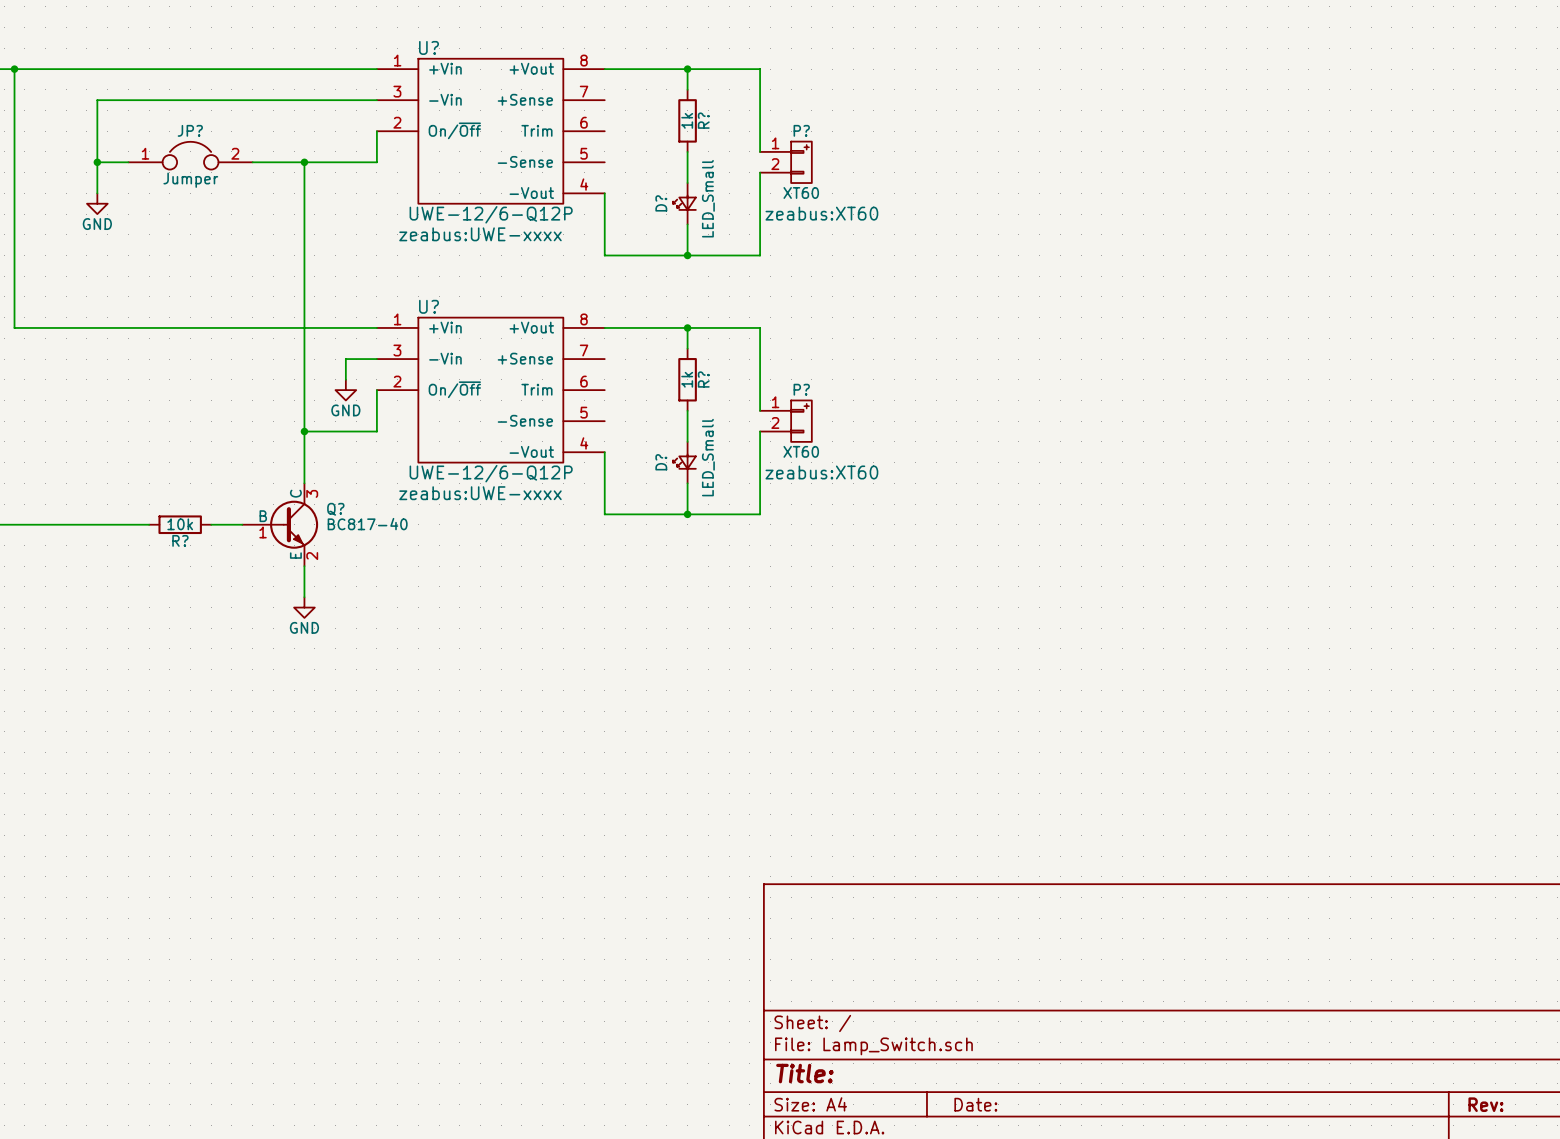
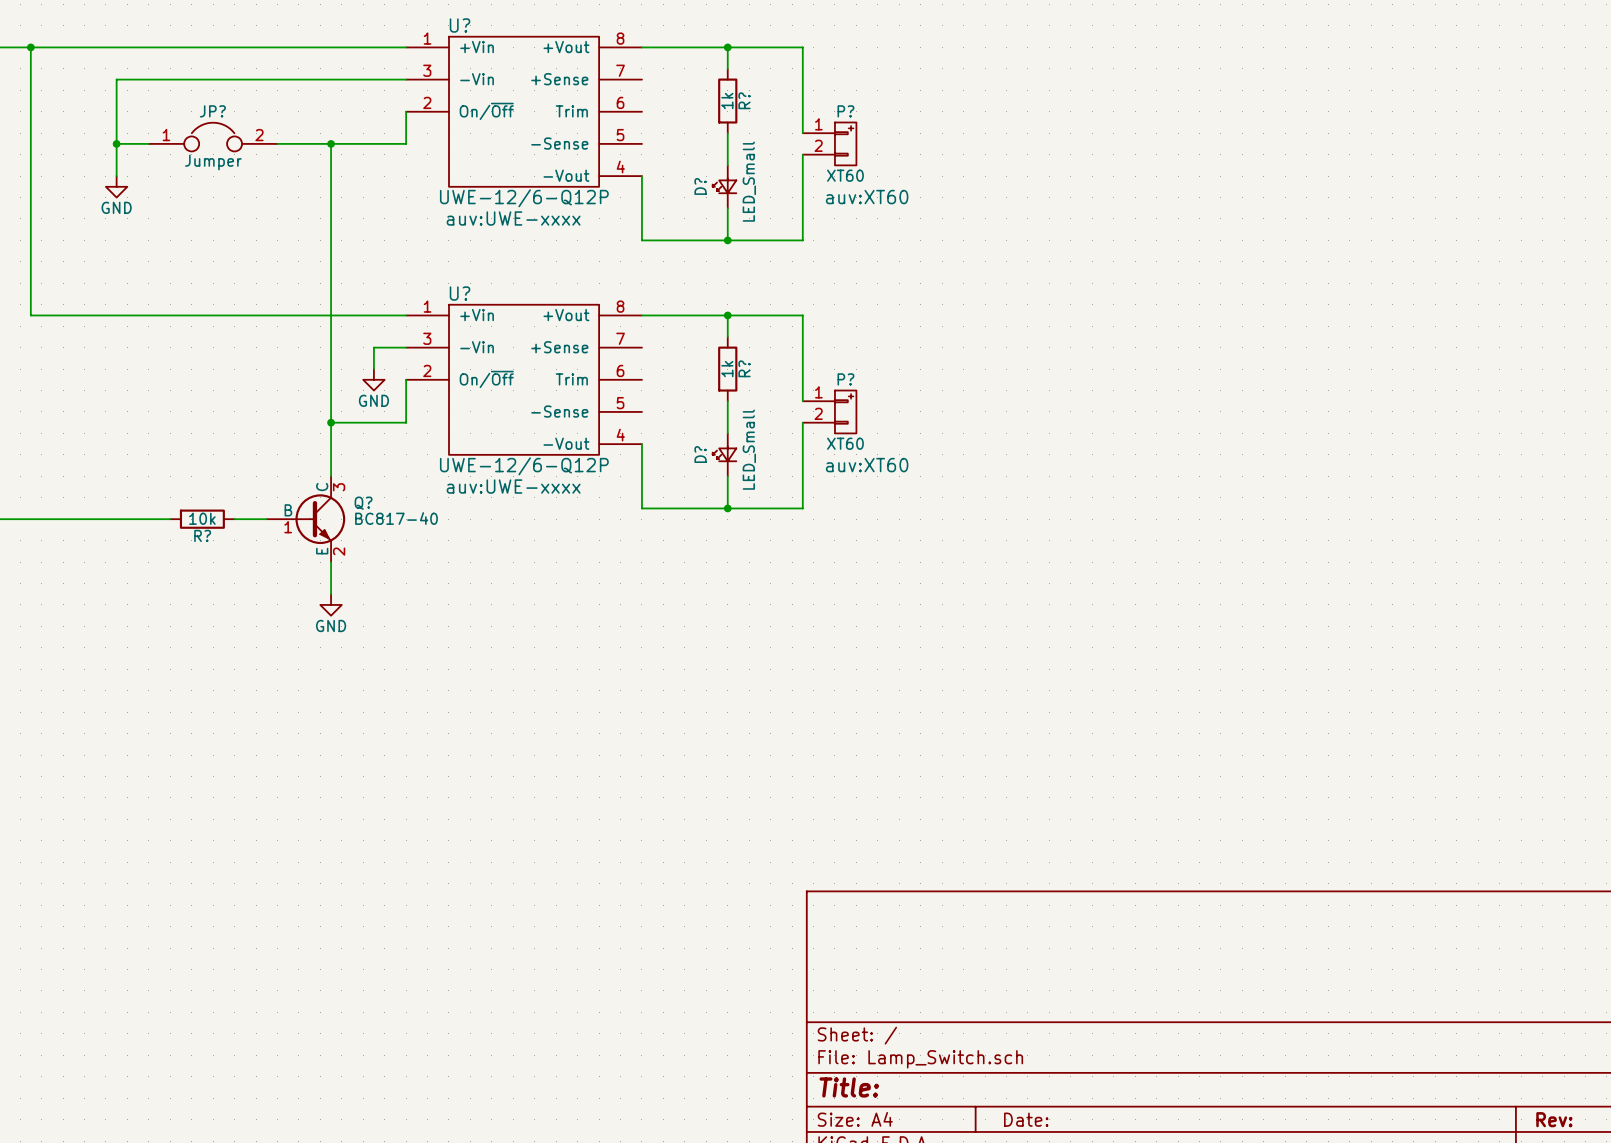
P? text: zeabus:XT60 (821, 213) -> auv:XT60 (867, 197)
U? text: zeabus:UWE-xxxx (480, 234) -> auv:UWE-xxxx (513, 218)
P? text: zeabus:XT60 (821, 472) -> auv:XT60 (867, 465)
U? text: zeabus:UWE-xxxx (480, 493) -> auv:UWE-xxxx (513, 486)

